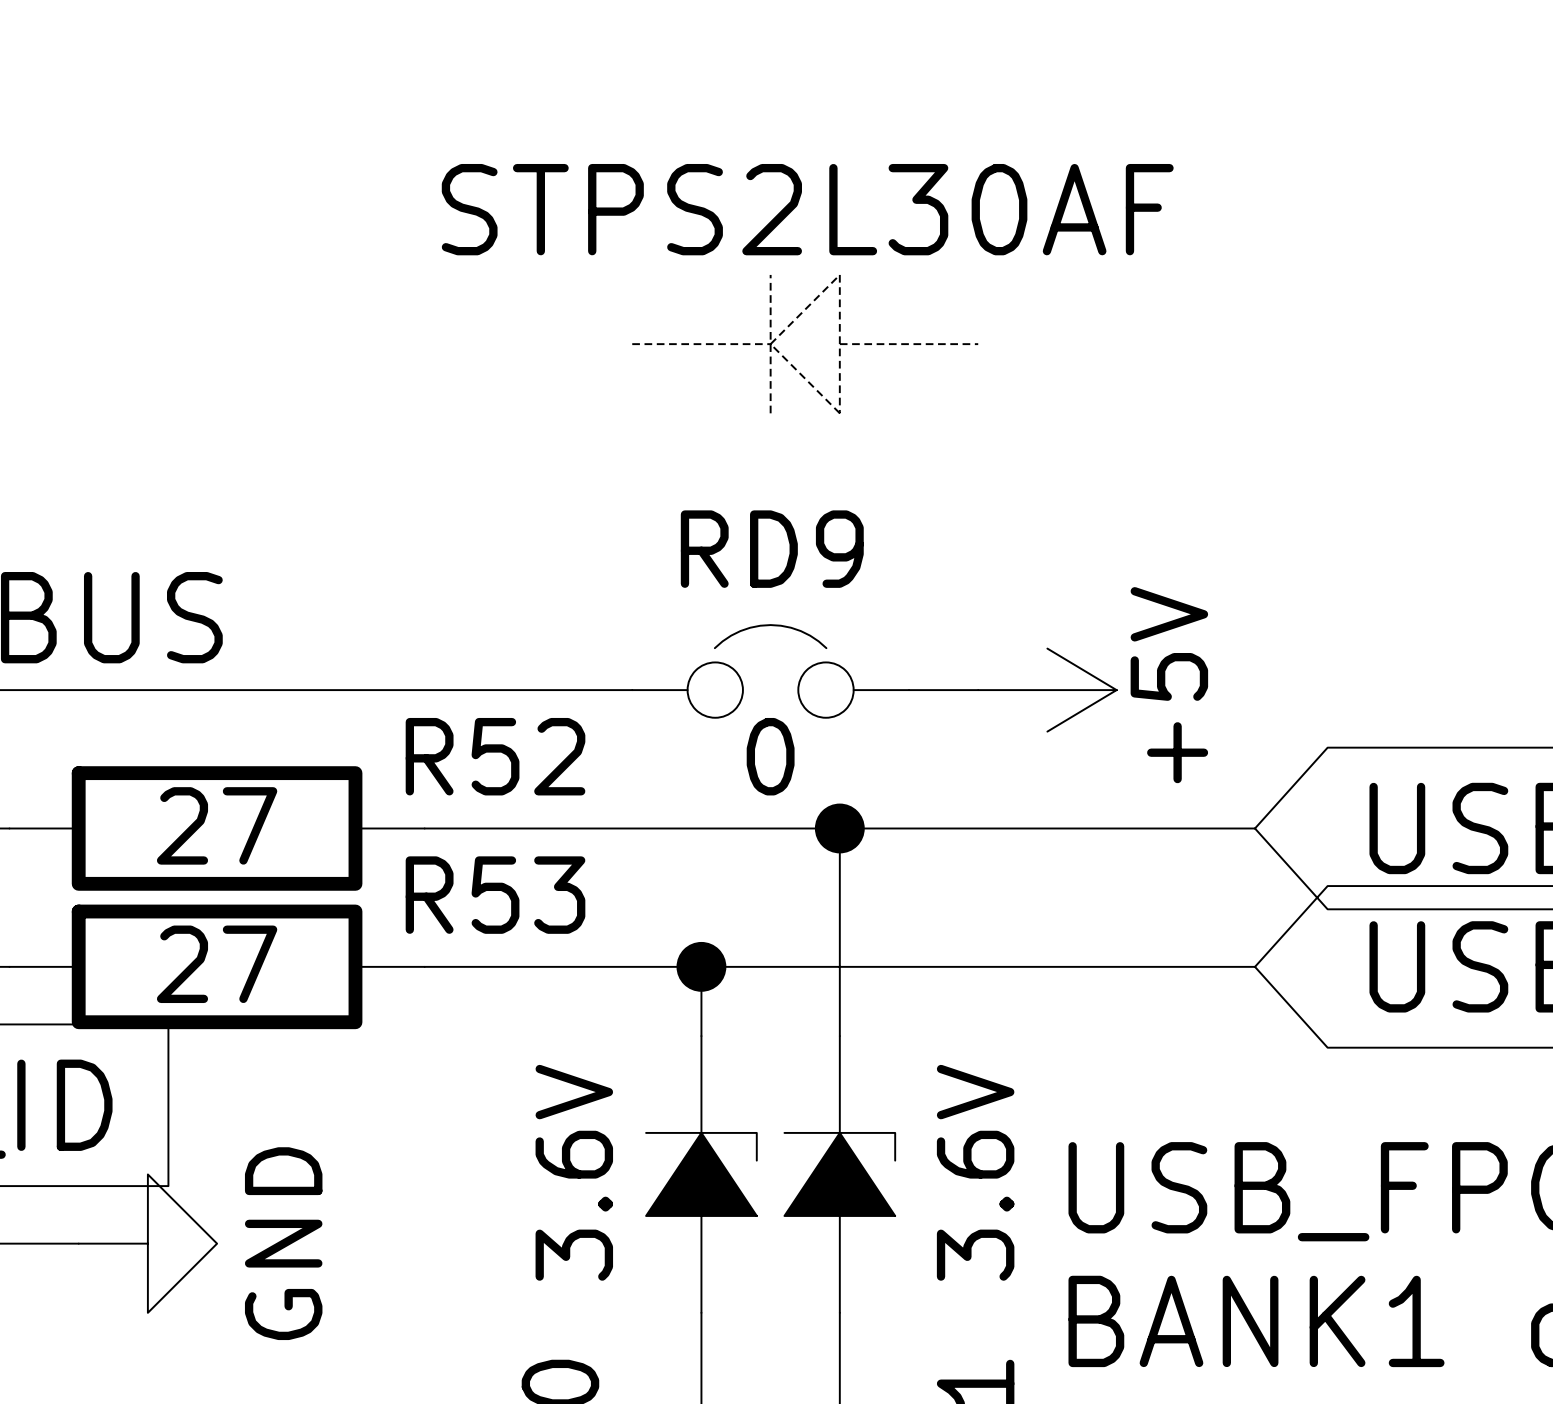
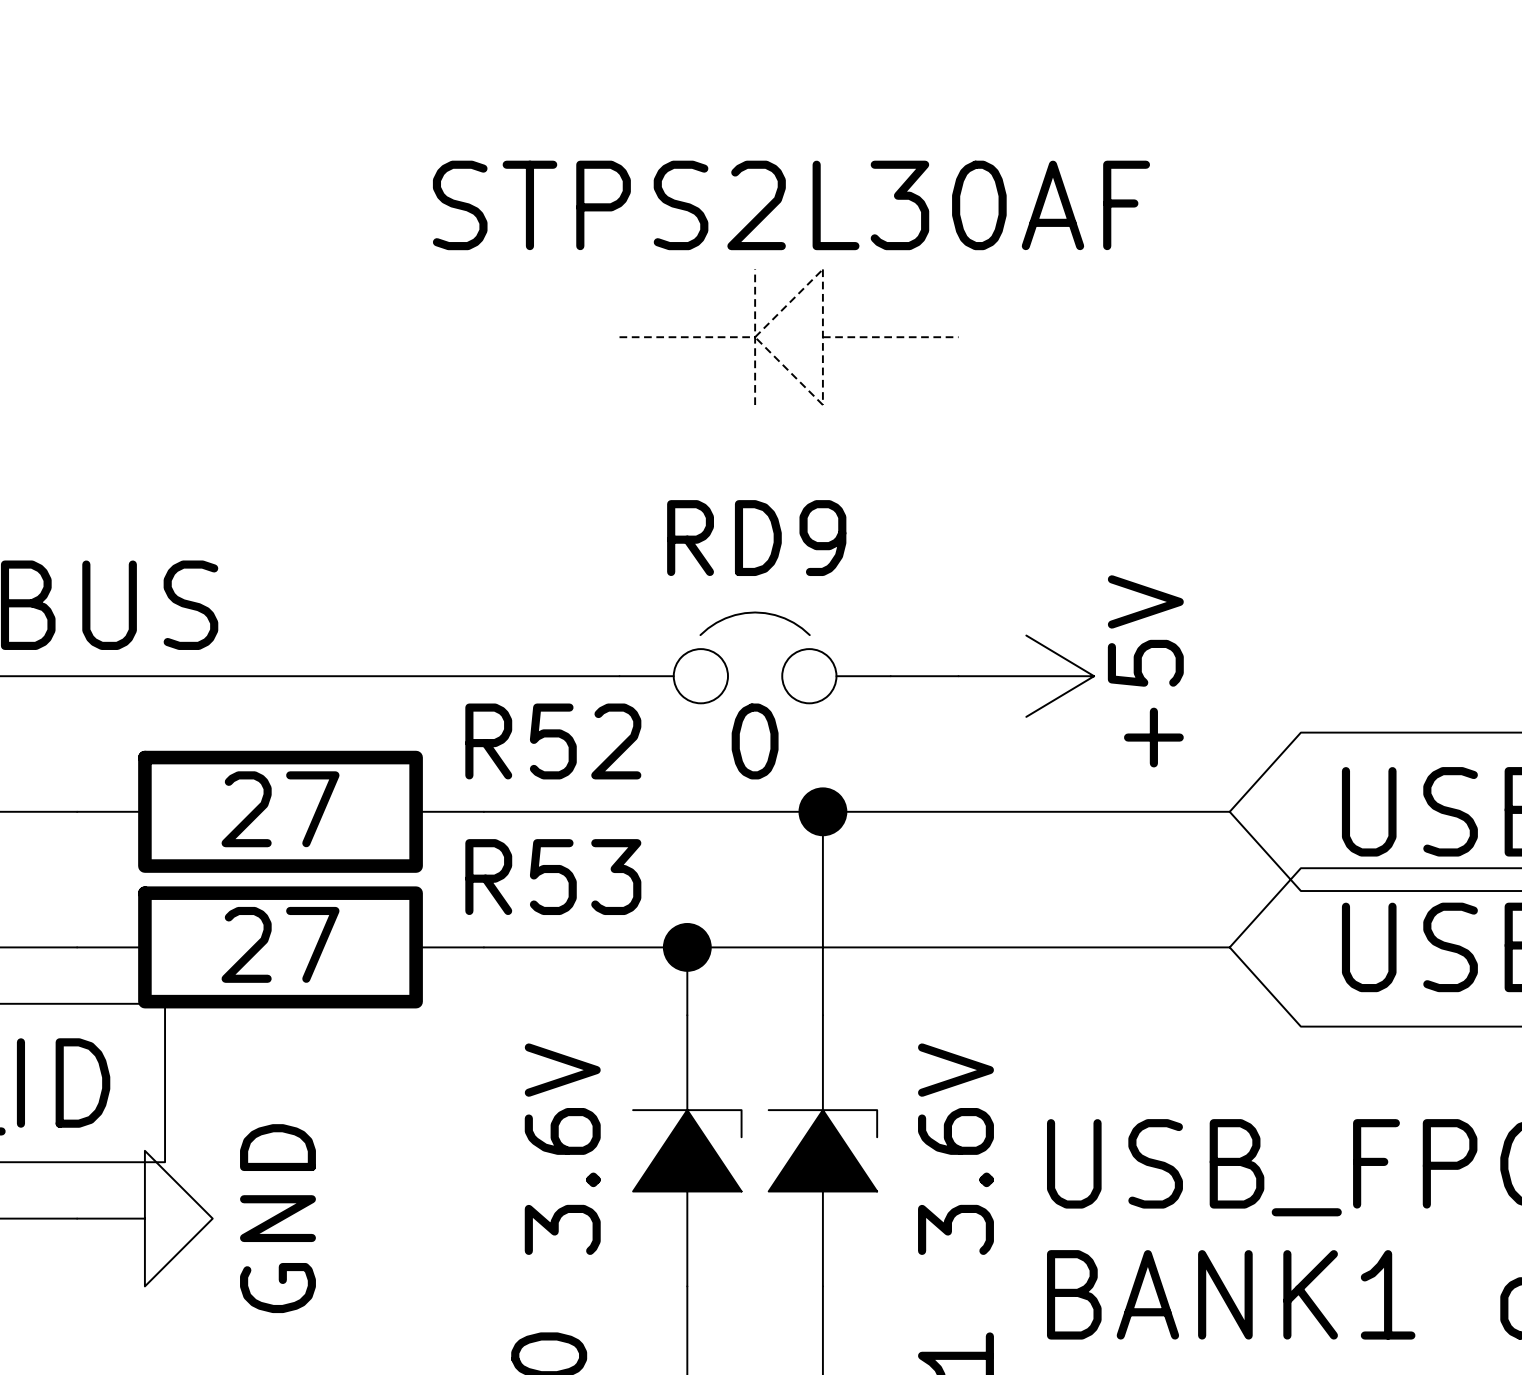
R52 position: (217, 828) -> (280, 811)
R53 position: (217, 966) -> (280, 947)

